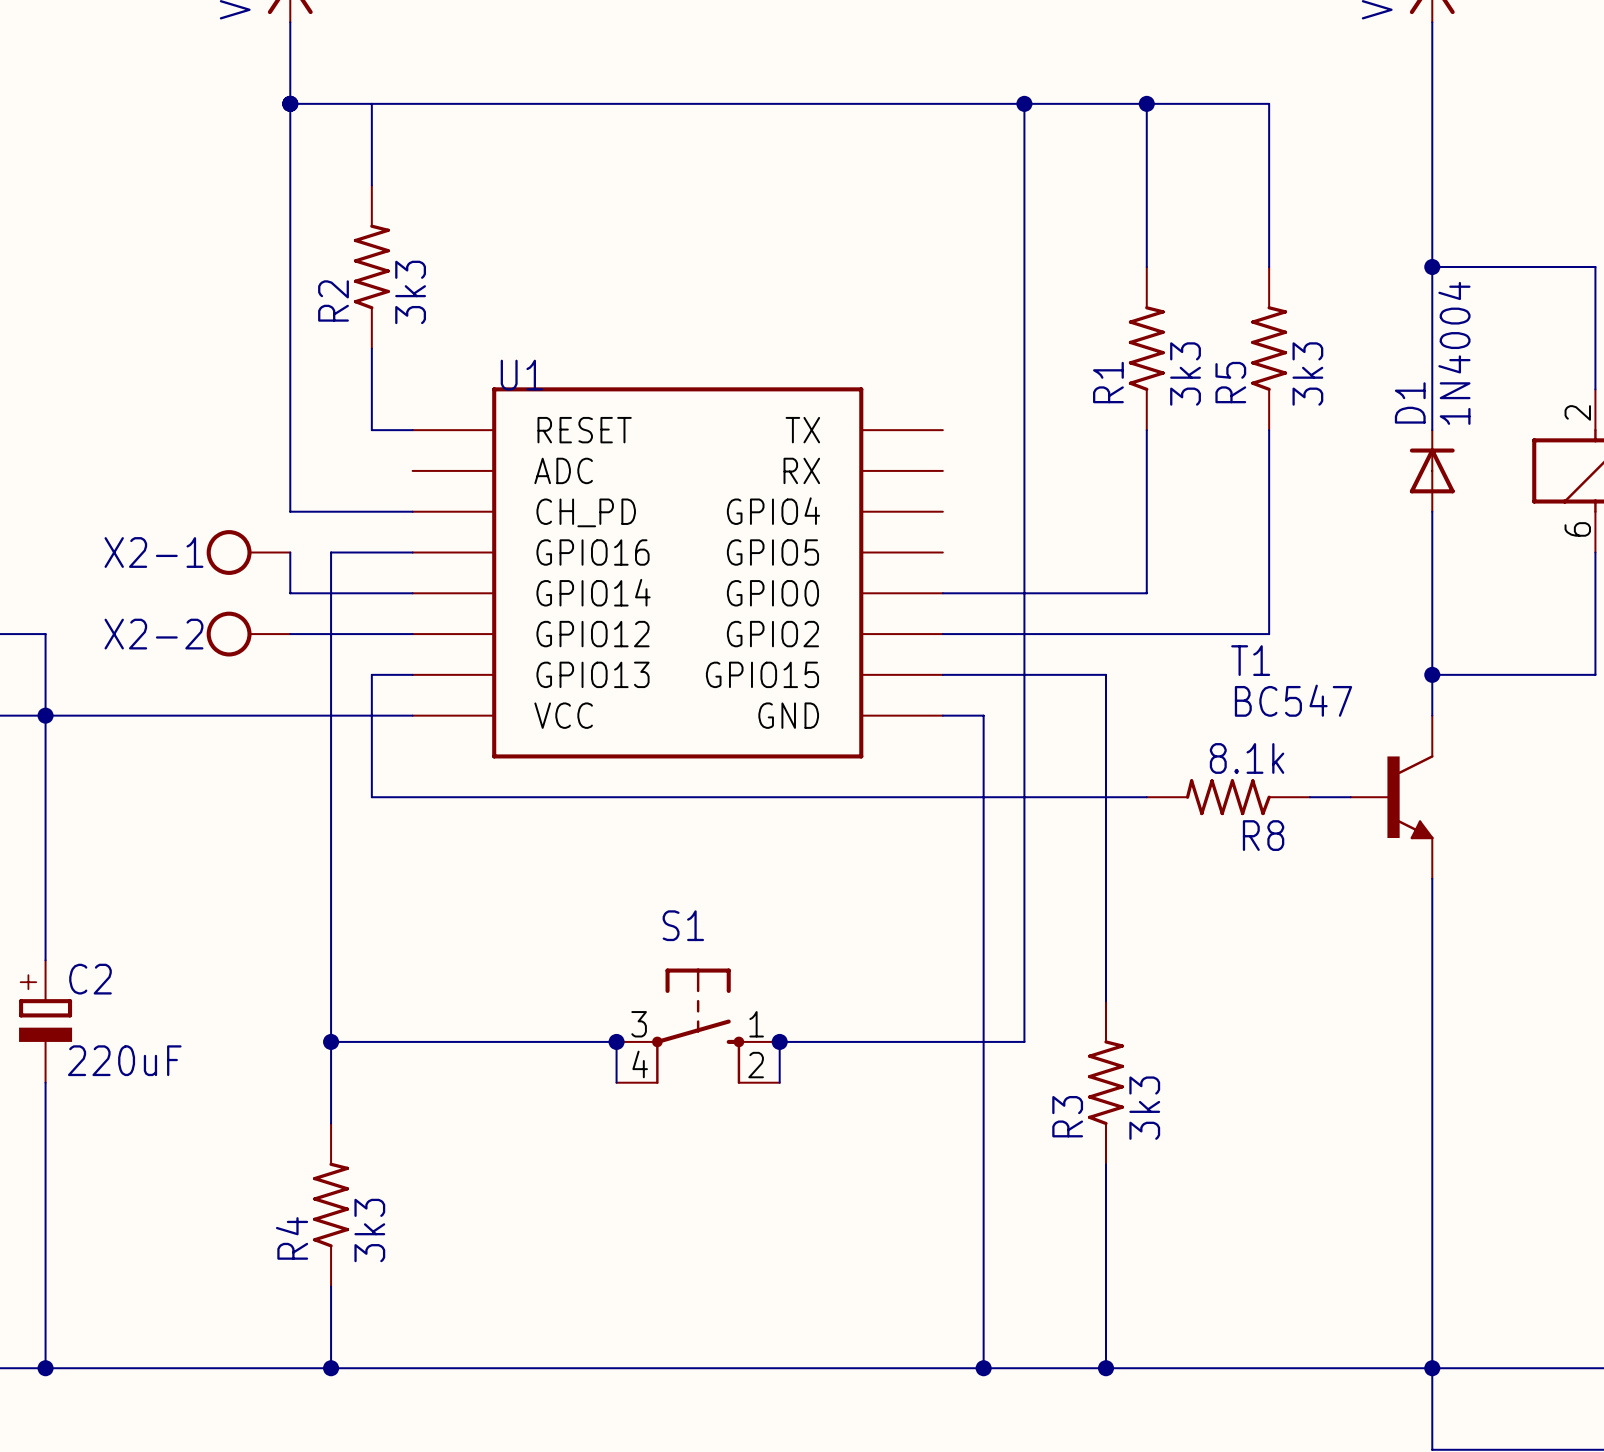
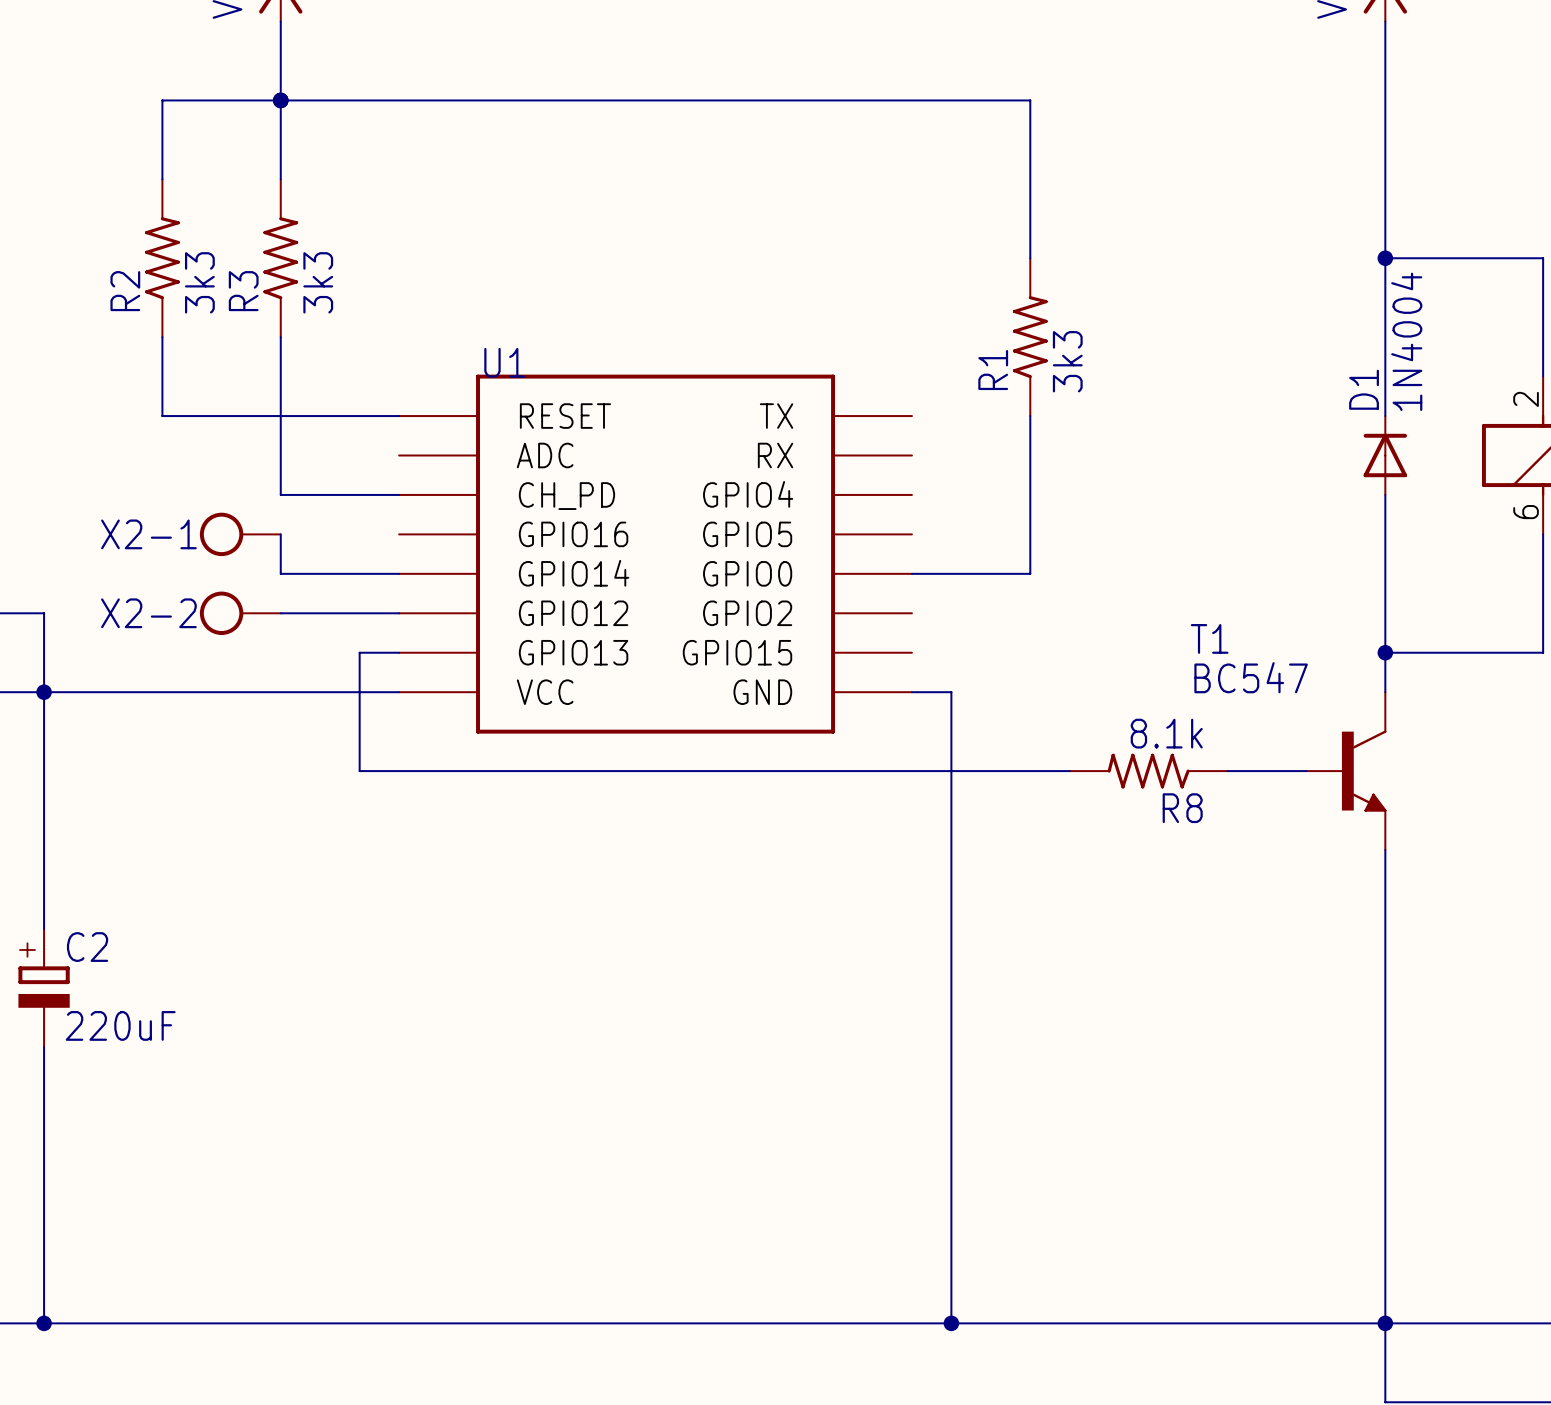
wire: none -> (280, 100) (162, 100) (162, 179)
wire: (371, 103) (371, 185) -> none
wire: (1024, 103) (1024, 1041) (779, 1041) (779, 1082) -> none
junction: (1024, 103) -> none
wire: (1065, 103) (1269, 103) (1269, 267) -> (1030, 100) (1030, 258)
wire: (1146, 103) (1146, 267) -> none
junction: (1146, 103) -> none
R2 position: (371, 267) -> (162, 258)
wire: (371, 348) (371, 430) -> (162, 337) (162, 416) (359, 416)
R1 position: (1146, 348) -> (1030, 337)
R5: 3k3 (1269, 348) -> none
wire: (1146, 430) (1146, 593) (1065, 593) -> (1030, 416) (1030, 573)
wire: (1269, 430) (1269, 634) (942, 634) -> none
wire: (412, 552) (331, 552) (331, 1123) -> none
wire: (942, 674) (1105, 674) (1105, 1001) -> none
R8 position: (1228, 797) -> (1148, 771)
S1: (698, 1026) -> none
wire: (331, 1041) (616, 1041) (616, 1082) -> none
junction: (331, 1041) -> none
junction: (616, 1041) -> none
junction: (779, 1041) -> none
R3 position: (1105, 1082) -> (280, 258)
wire: (1105, 1164) (1105, 1368) -> none
R4: 3k3 (331, 1205) -> none
wire: (331, 1286) (331, 1368) -> none
junction: (331, 1368) -> none
junction: (1105, 1368) -> none

